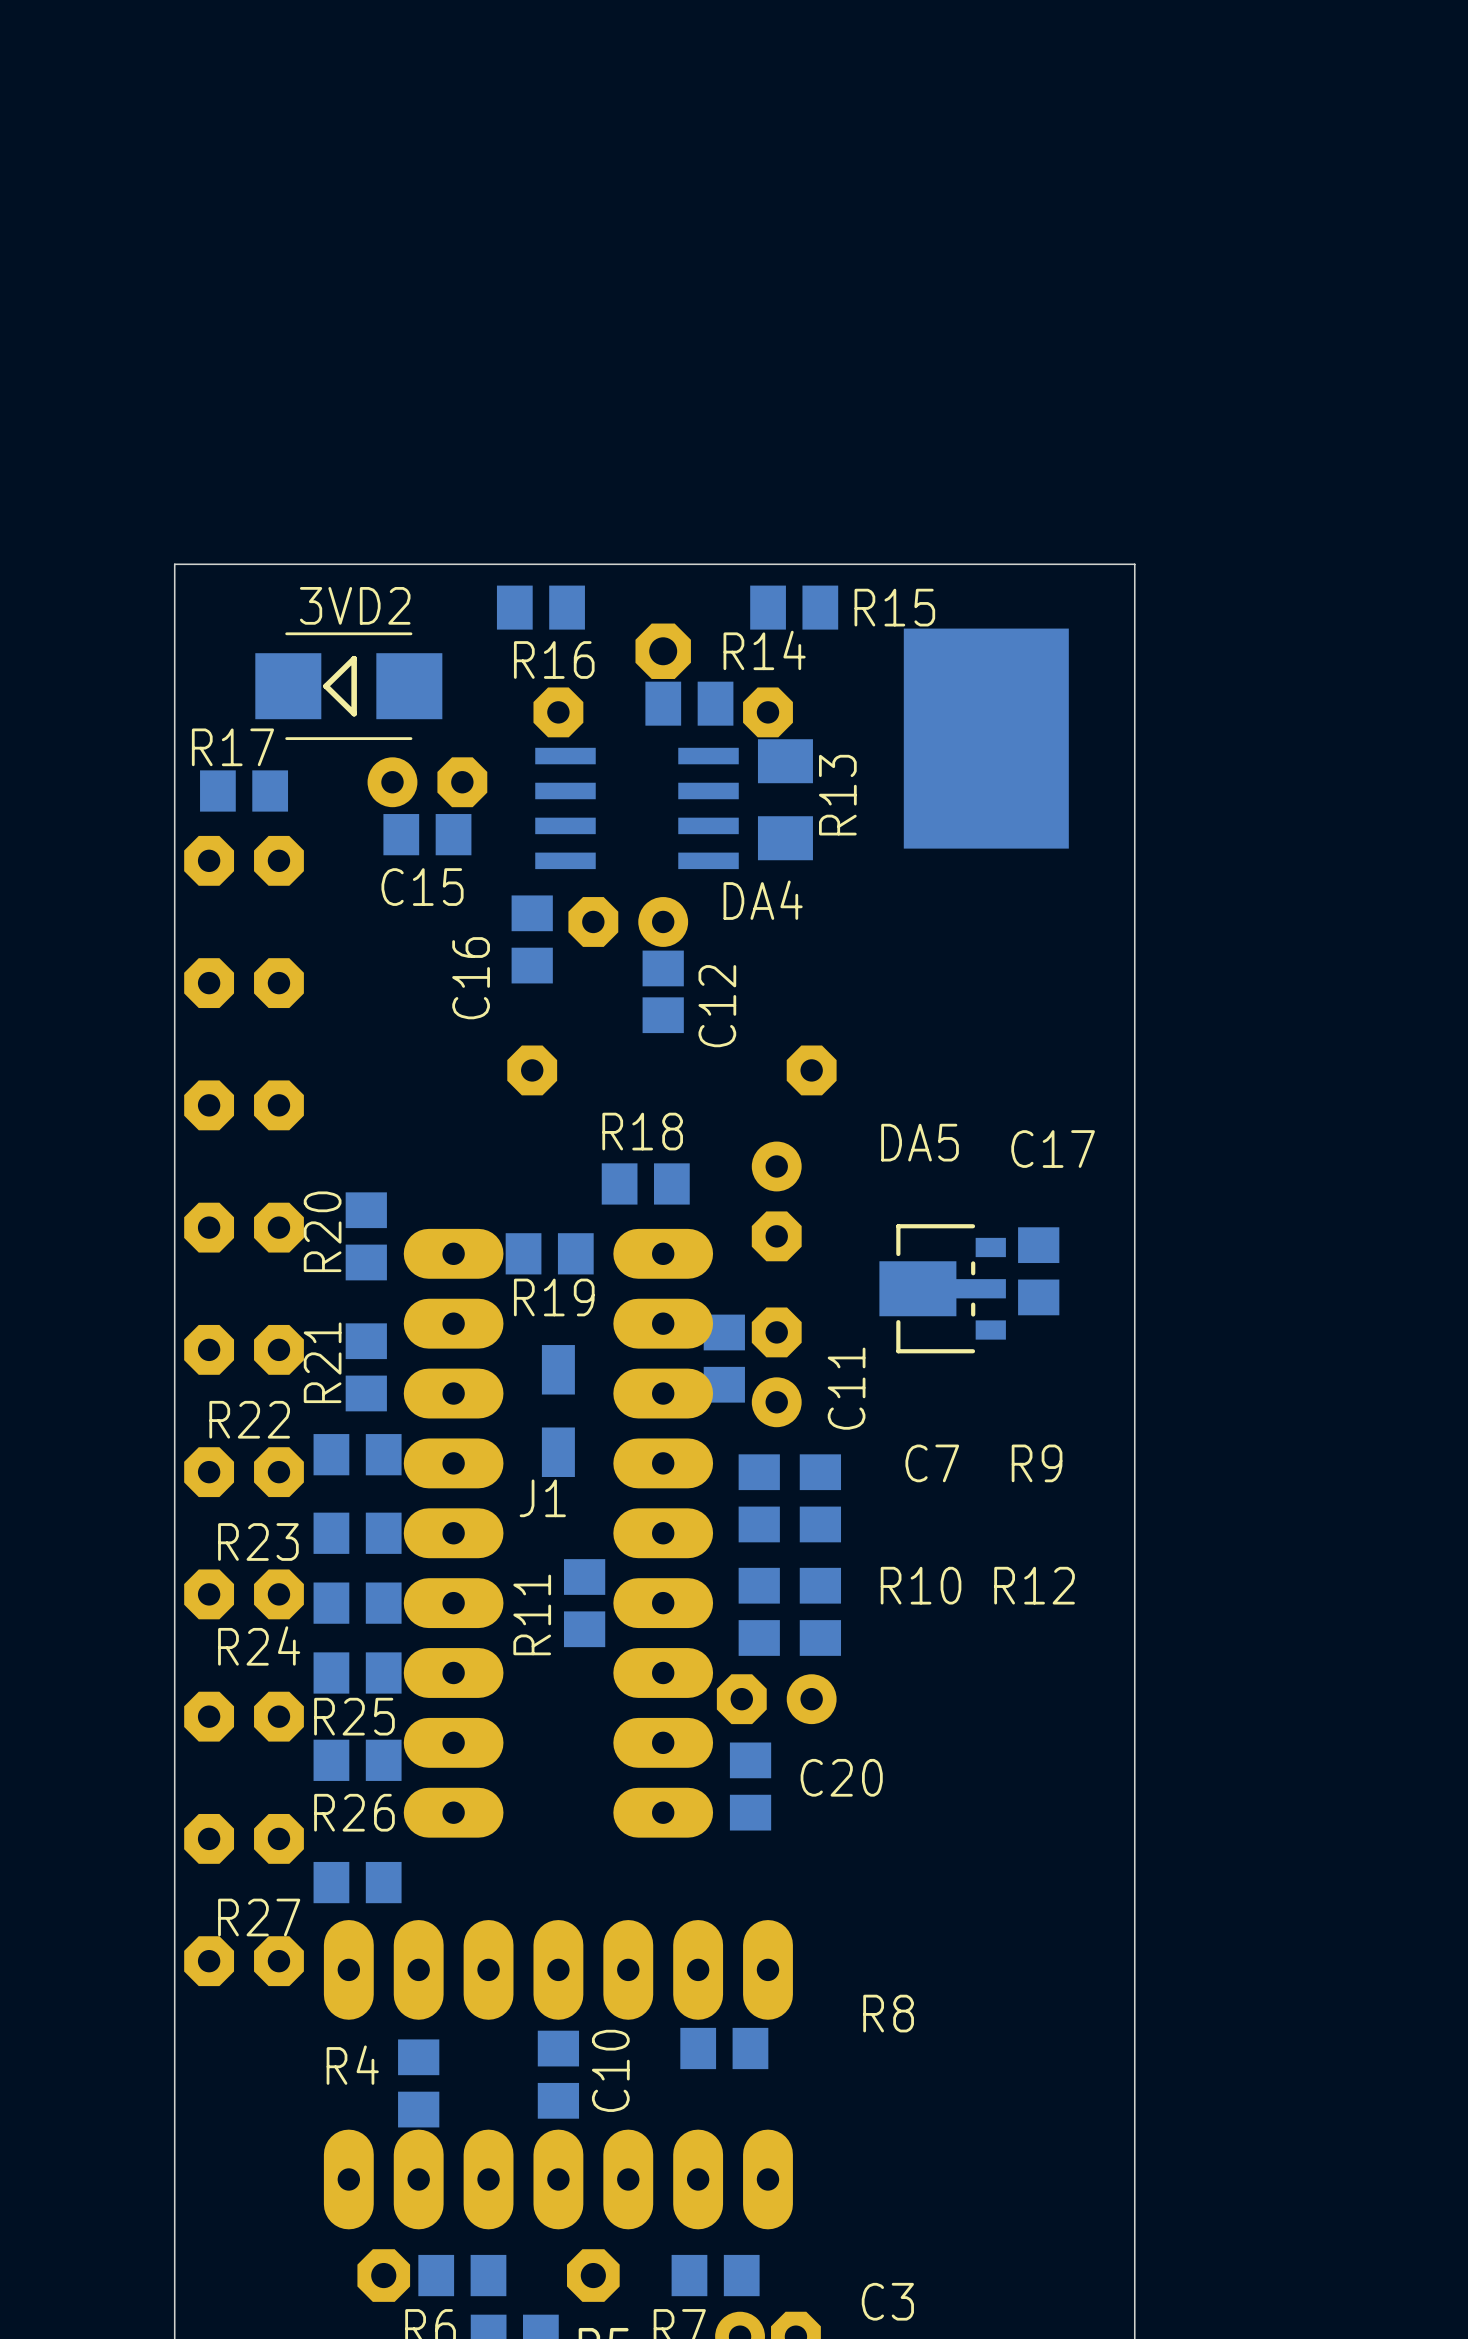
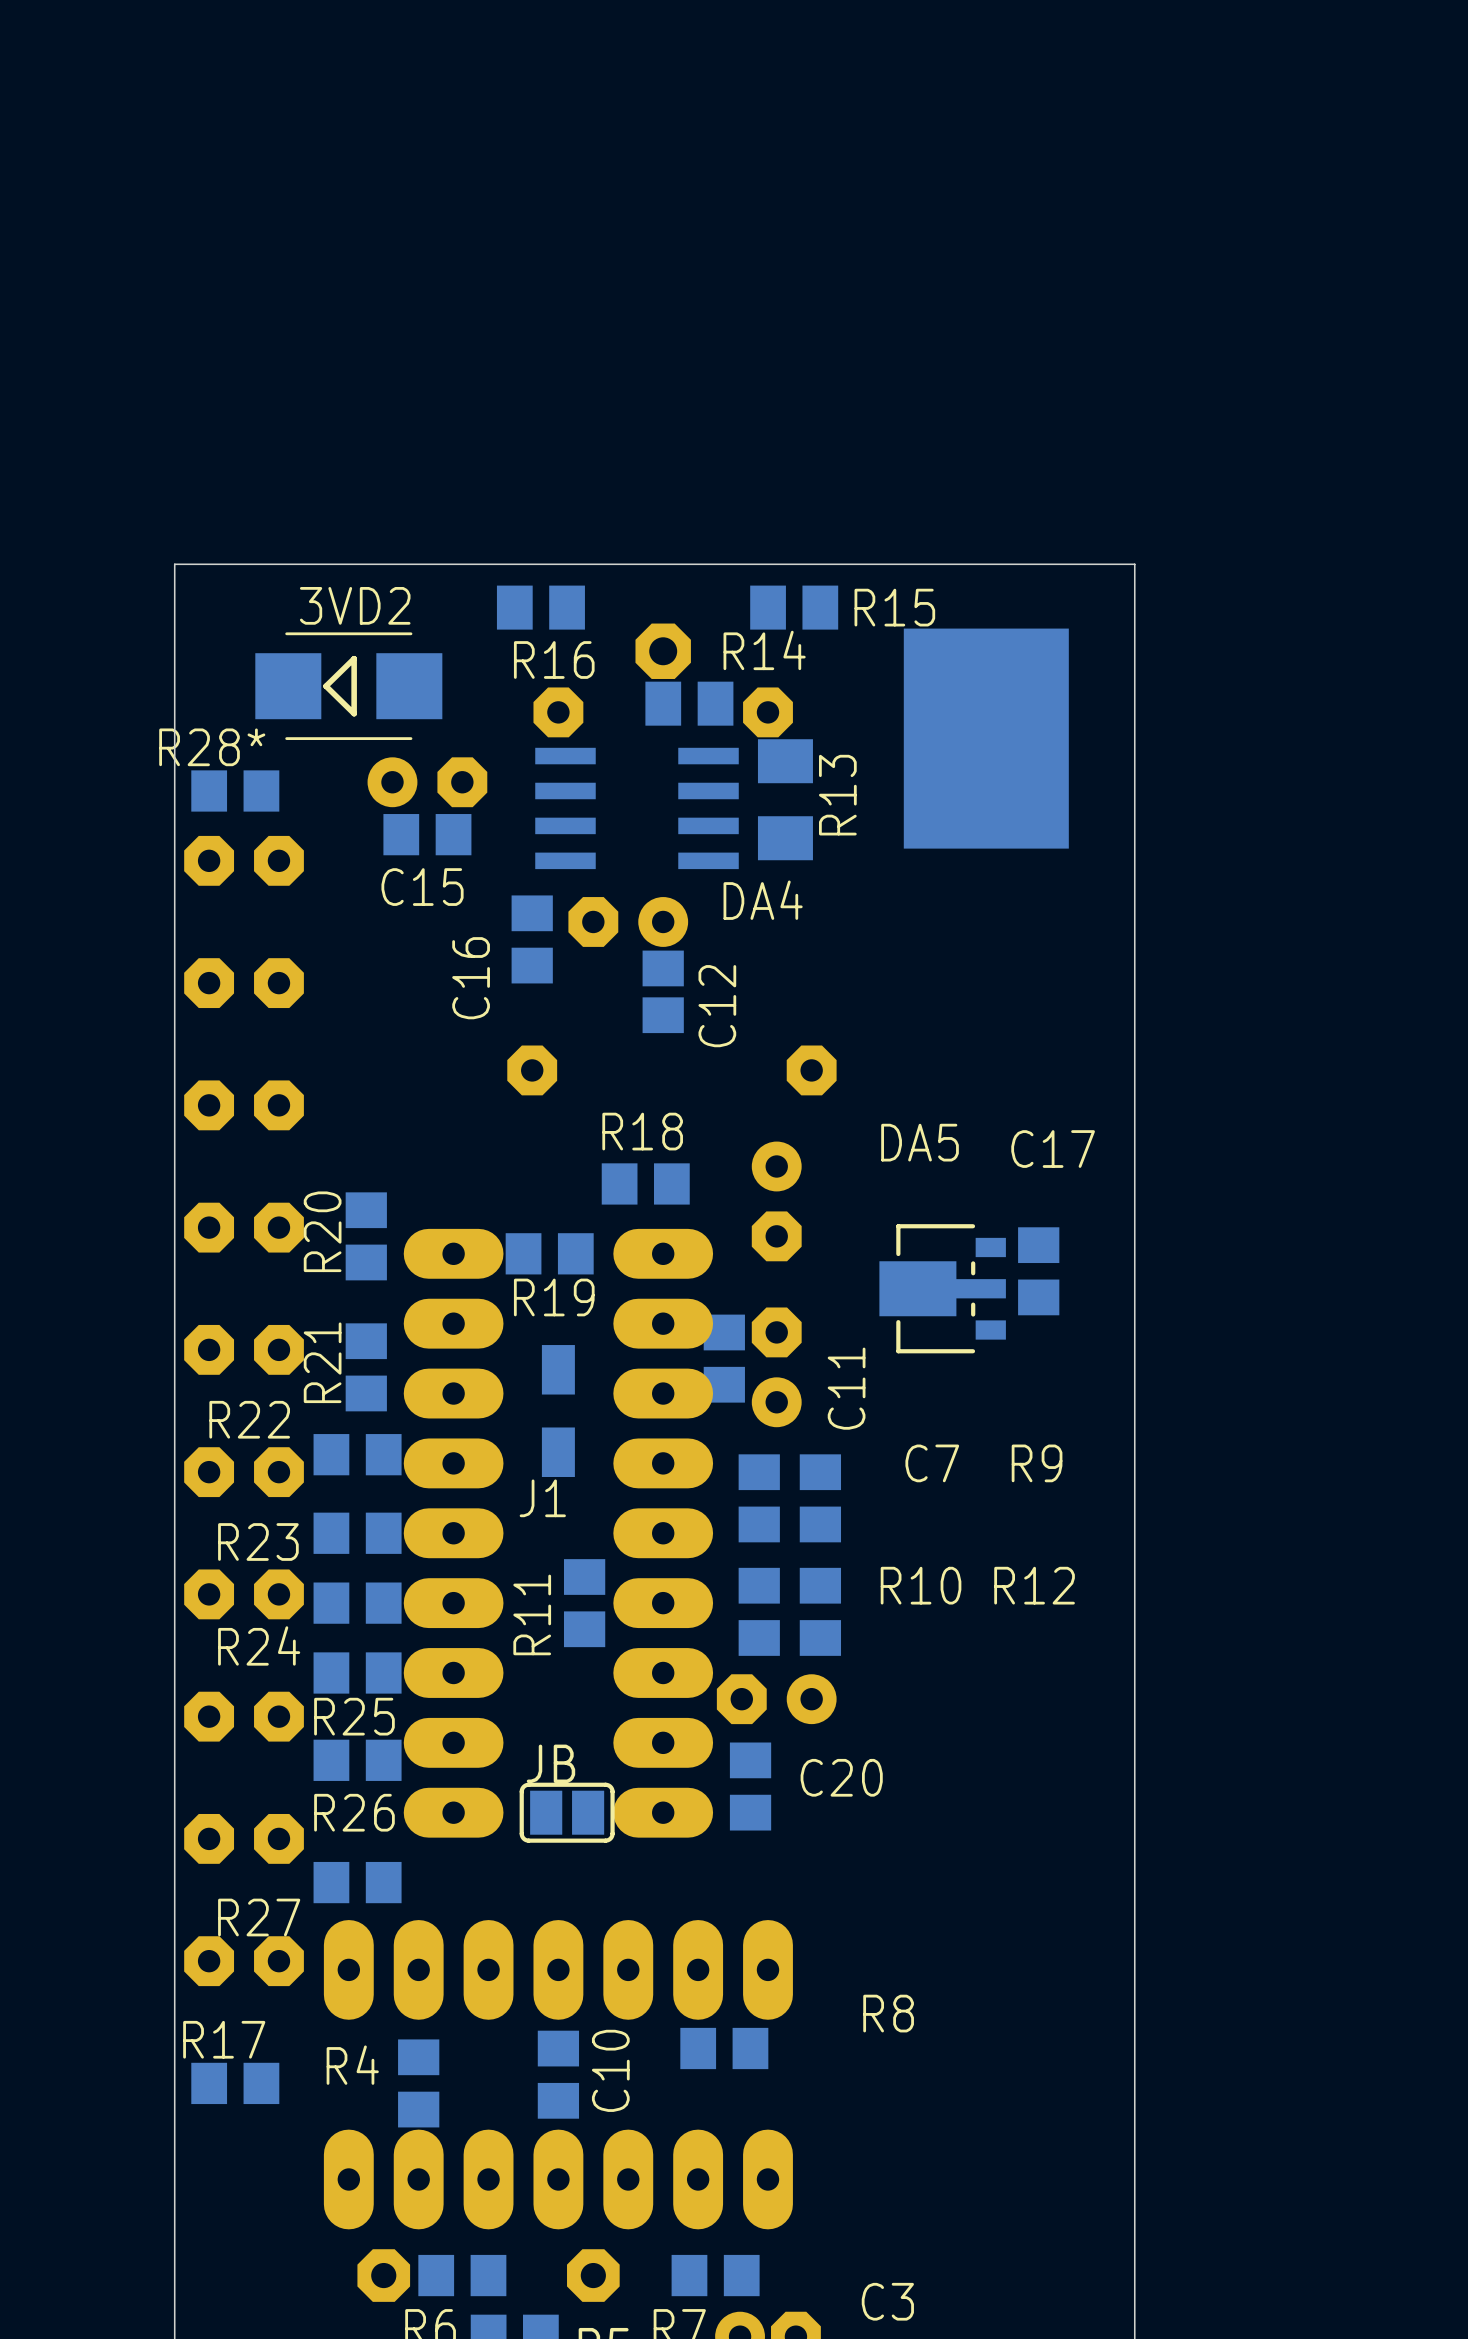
R28*: none -> (235, 790)
R17 position: (244, 790) -> (235, 2083)
JB: none -> (567, 1812)

